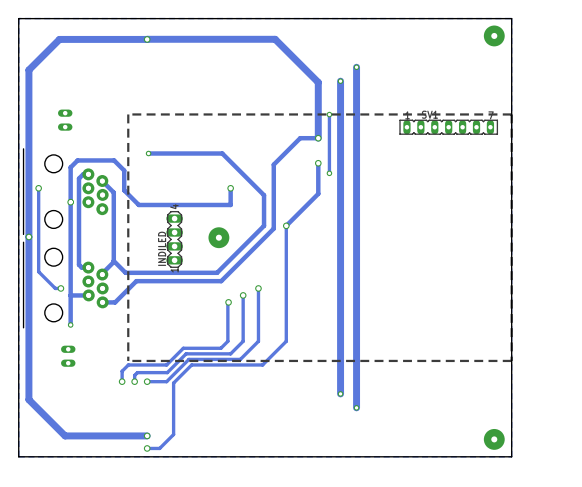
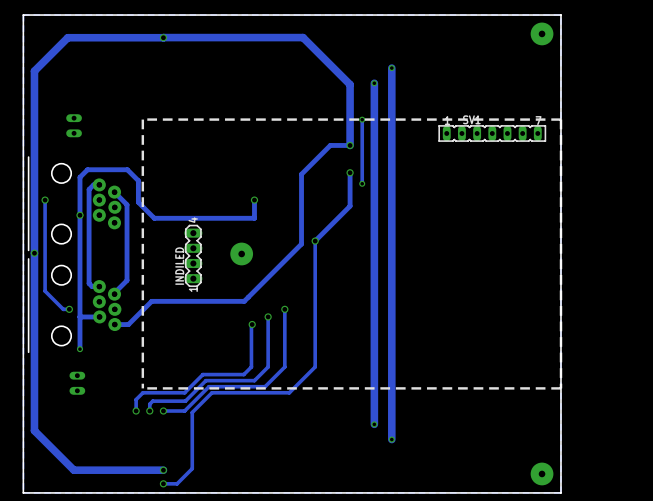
track: (148, 153) (222, 153) (264, 195) (264, 225) (217, 272) (125, 272) (113, 260) -> none
via: (148, 153) -> none

